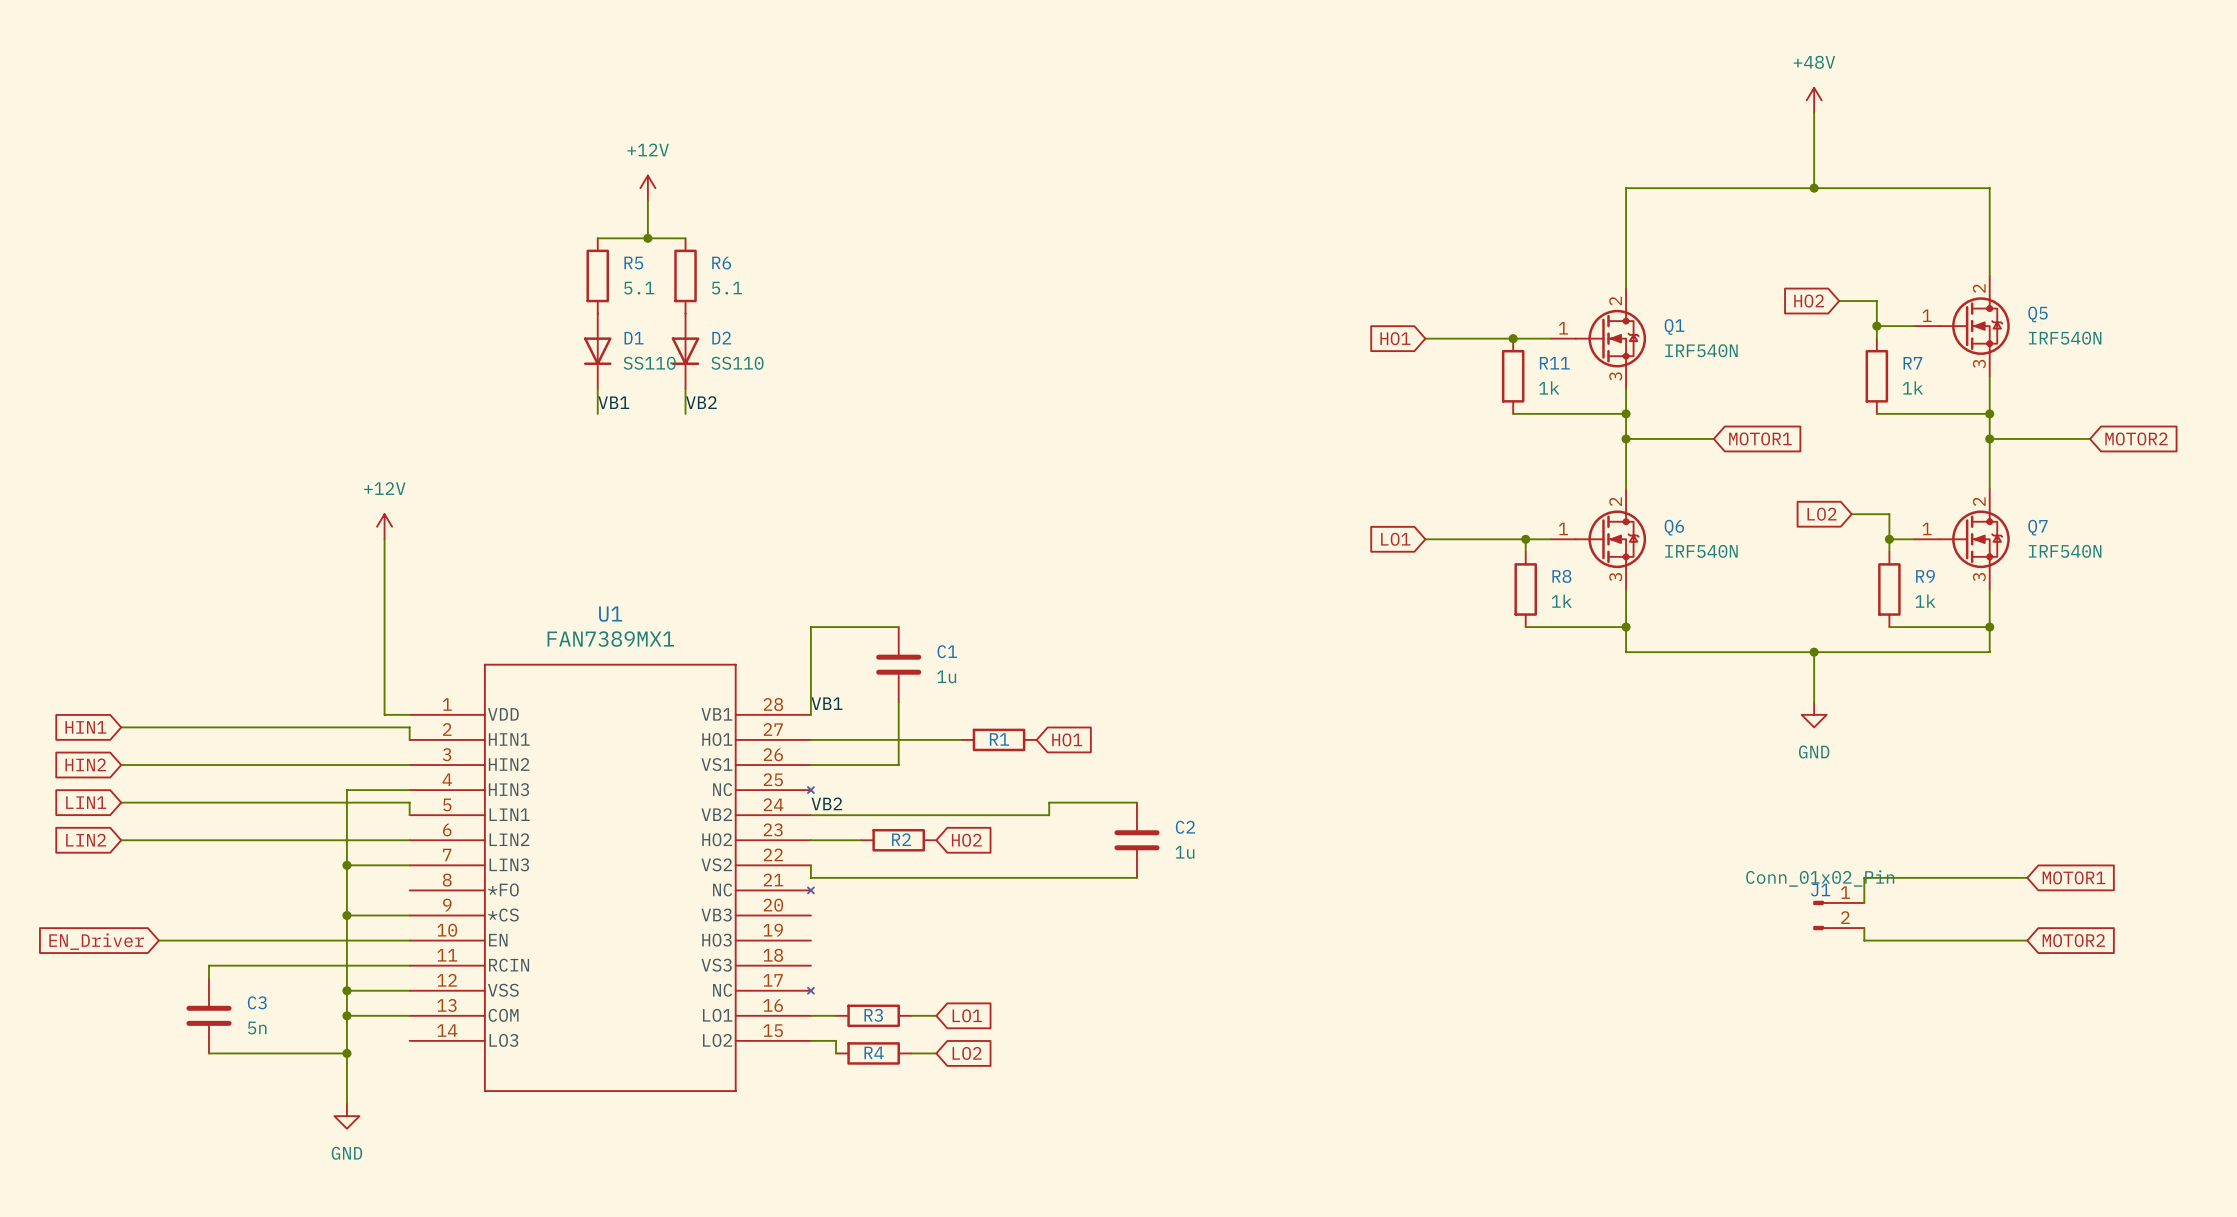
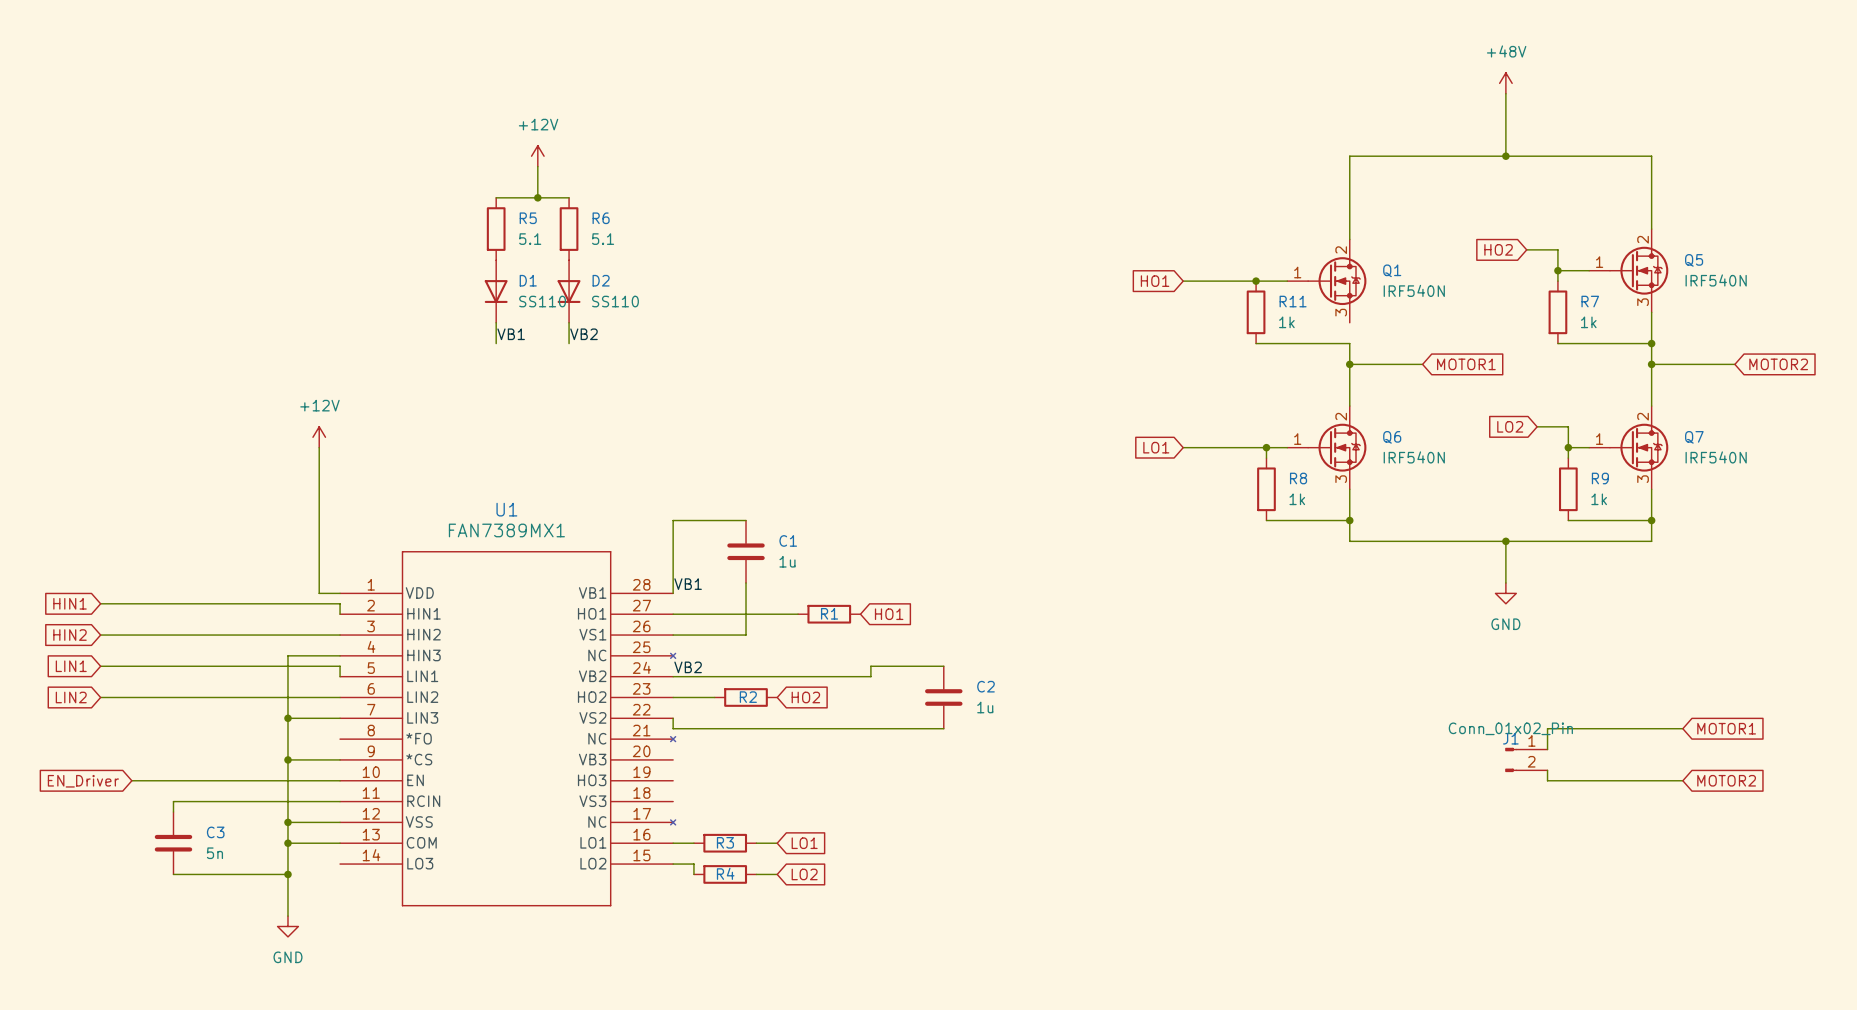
wire: (1626, 388) (1626, 413) -> none
junction: (1626, 413) -> none

